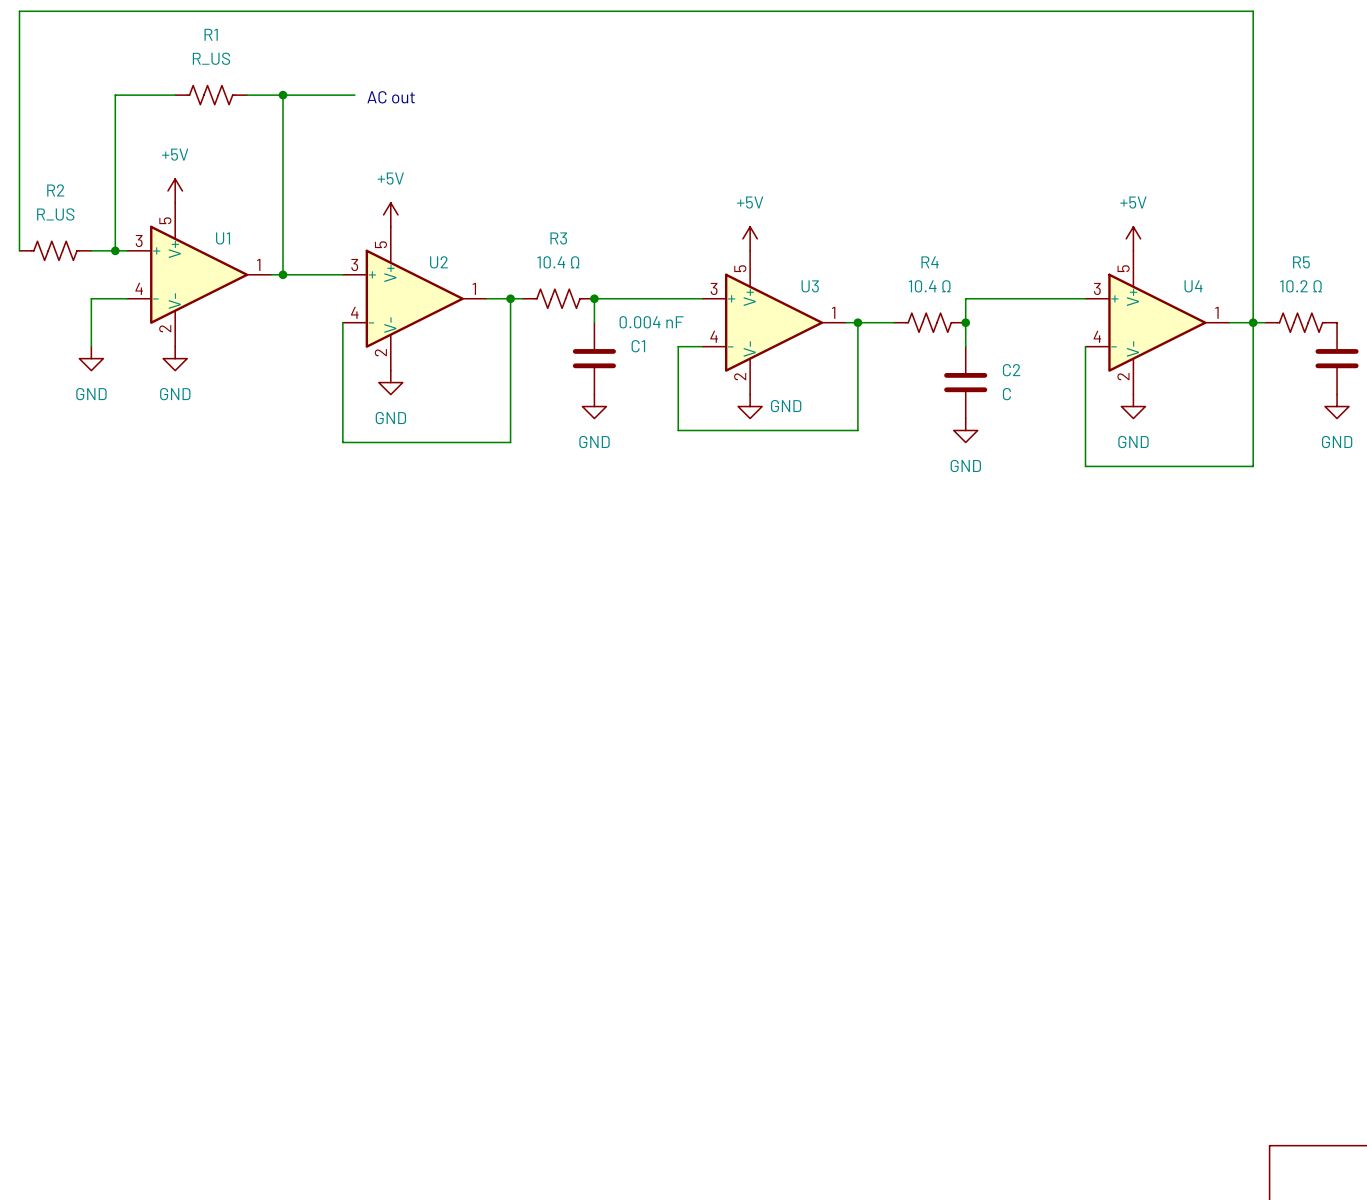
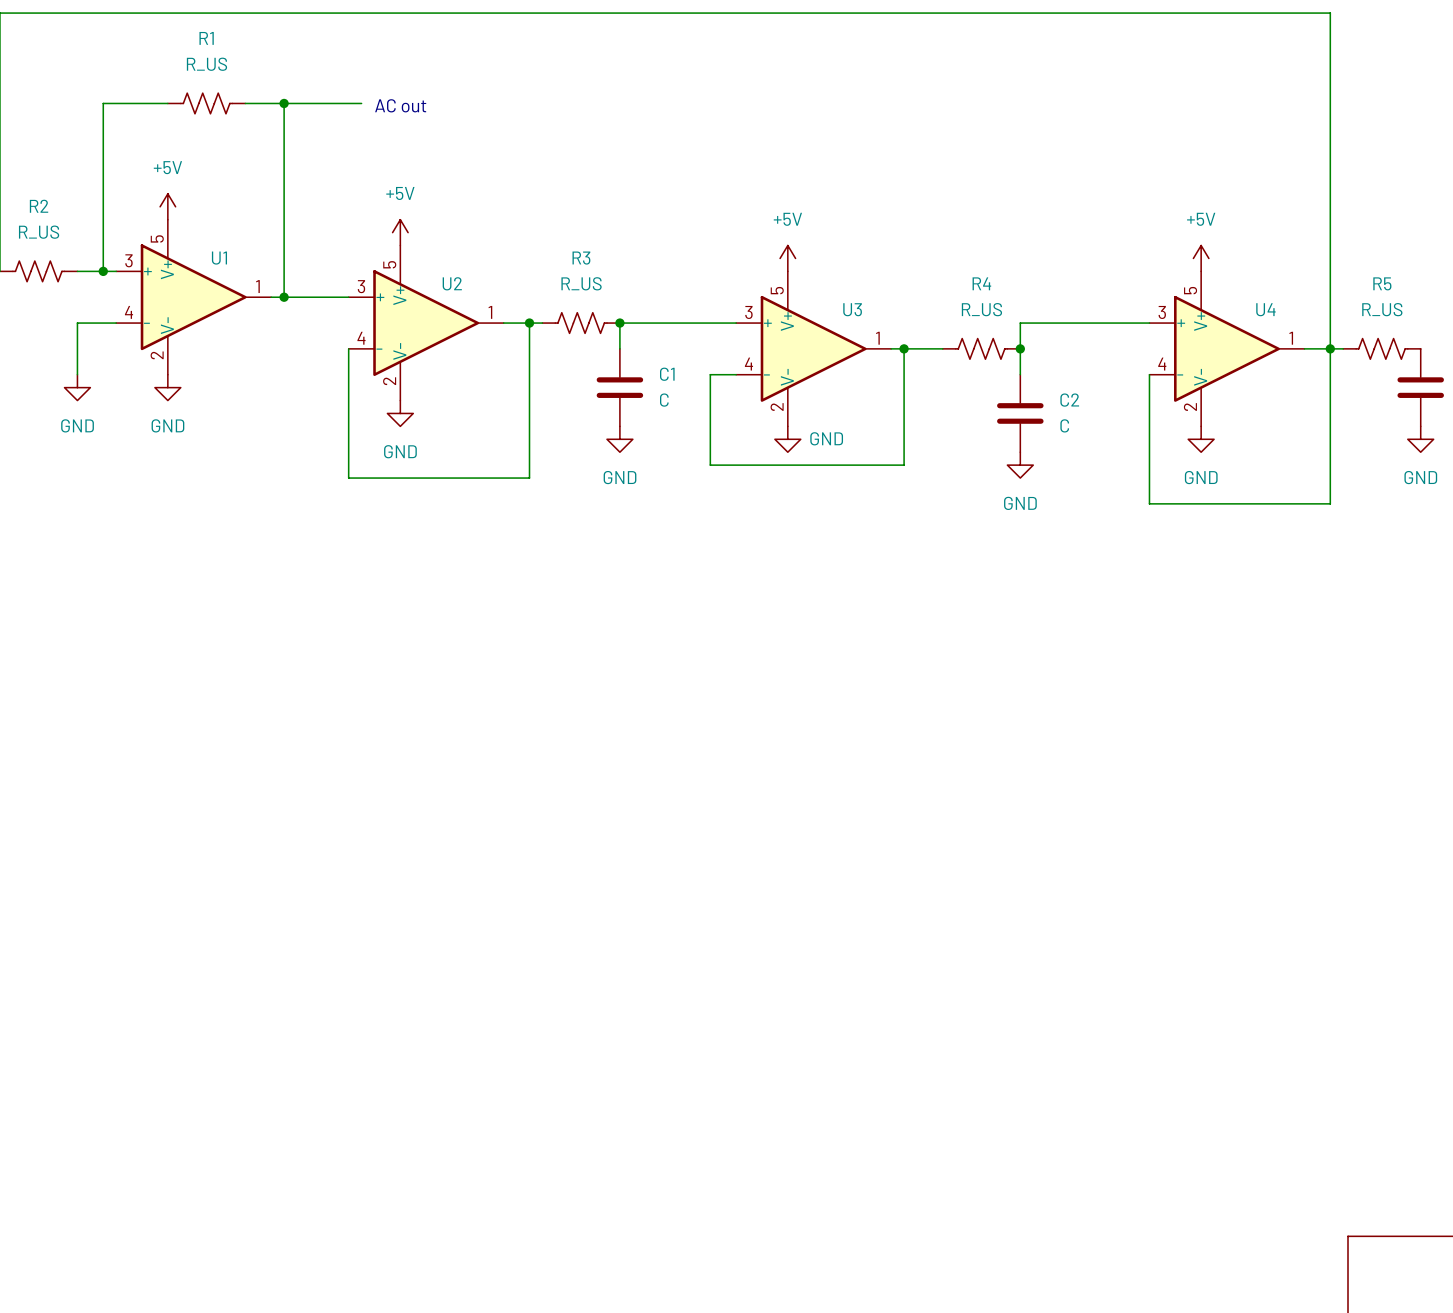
R3 value: 10.4 Ω (558, 262) -> R_US (581, 283)
R4 value: 10.4 Ω (929, 286) -> R_US (981, 309)
R5 value: 10.2 Ω (1300, 286) -> R_US (1382, 309)
C1 value: 0.004 nF (651, 322) -> C (664, 400)

